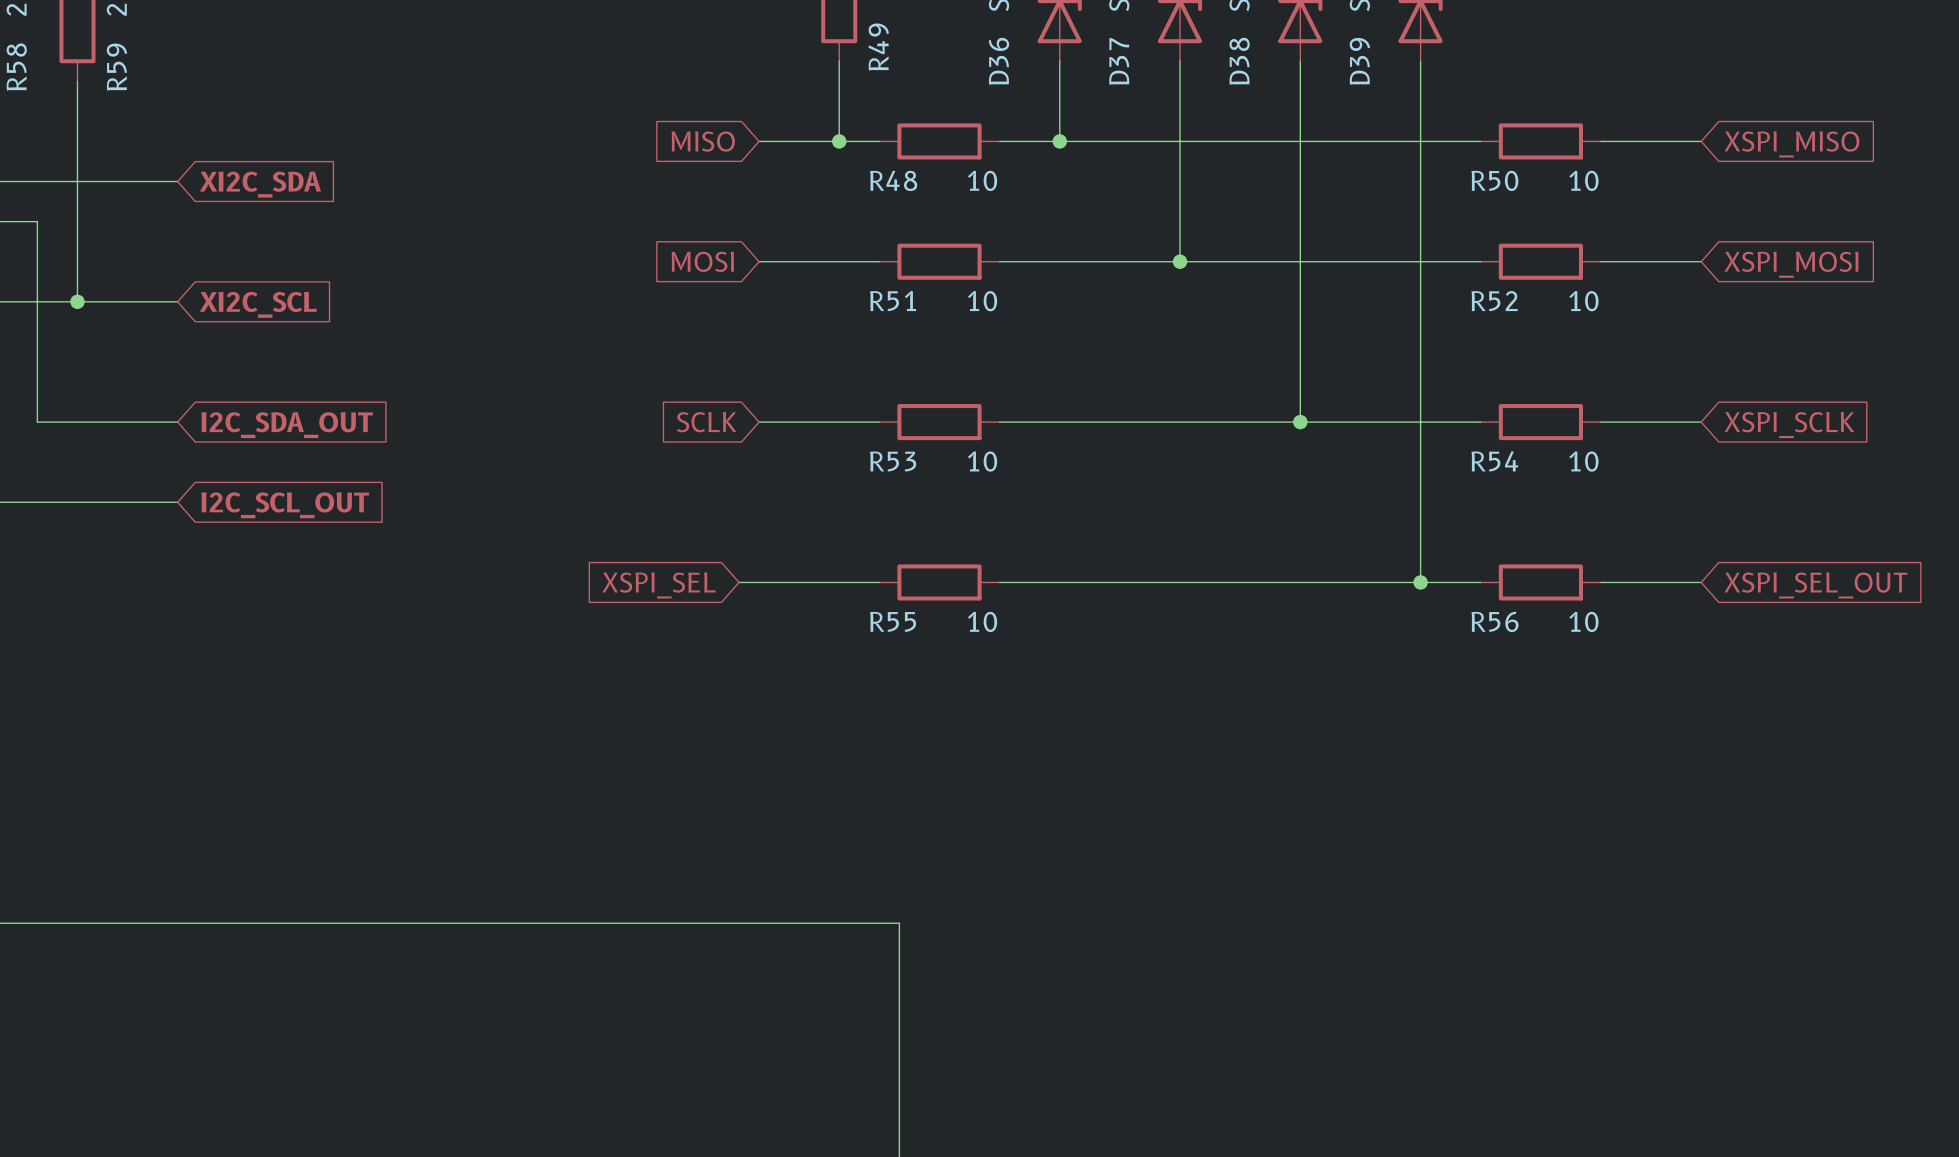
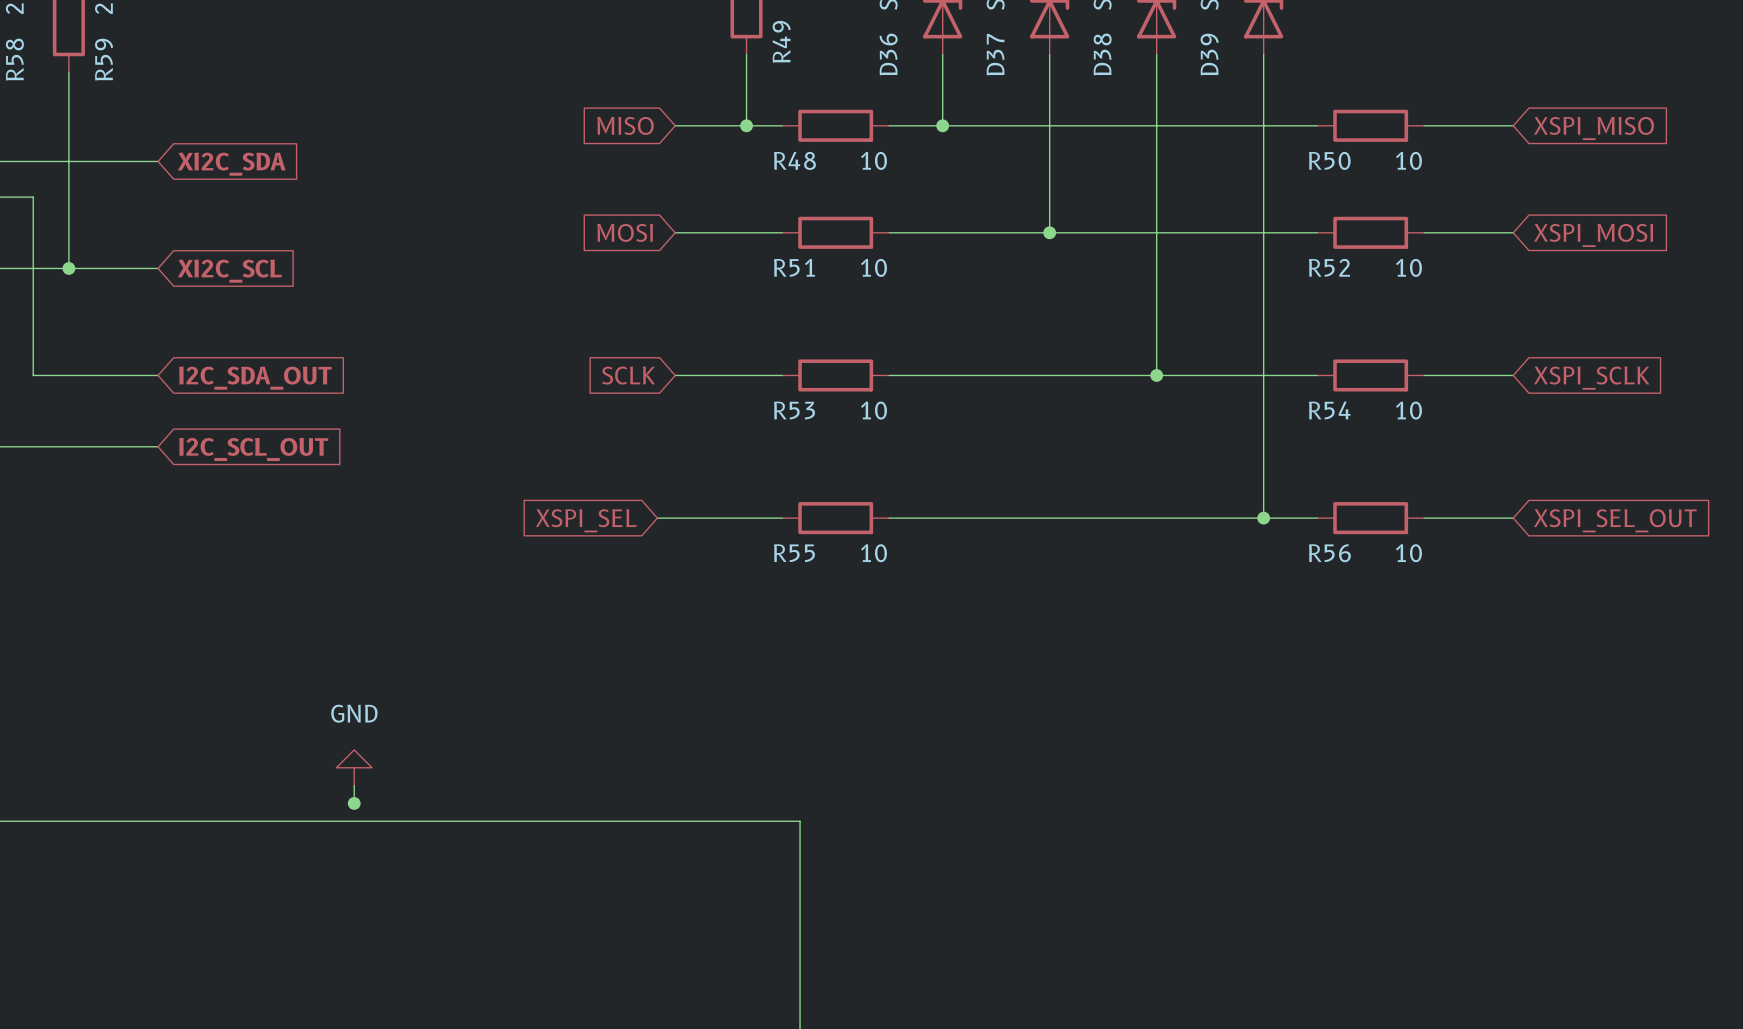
power symbol: none -> GND (354, 767)
wire: none -> (354, 785) (354, 803)
junction: none -> (354, 803)

